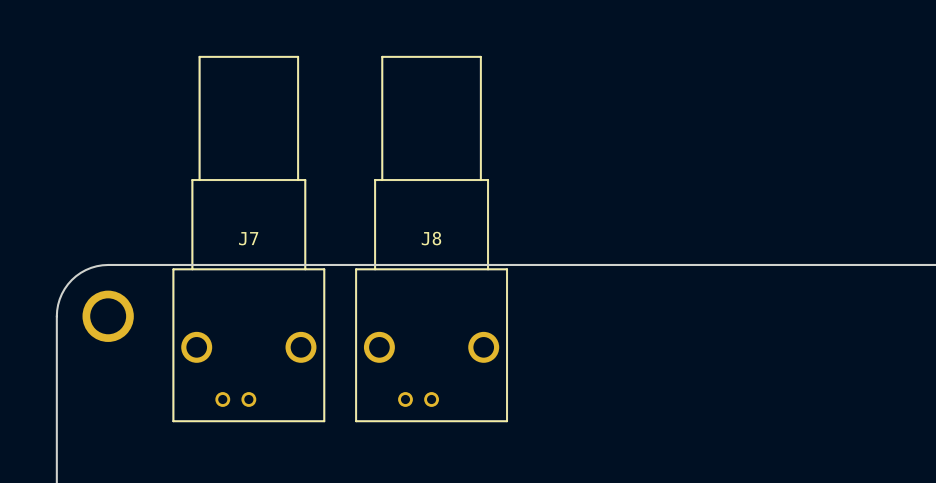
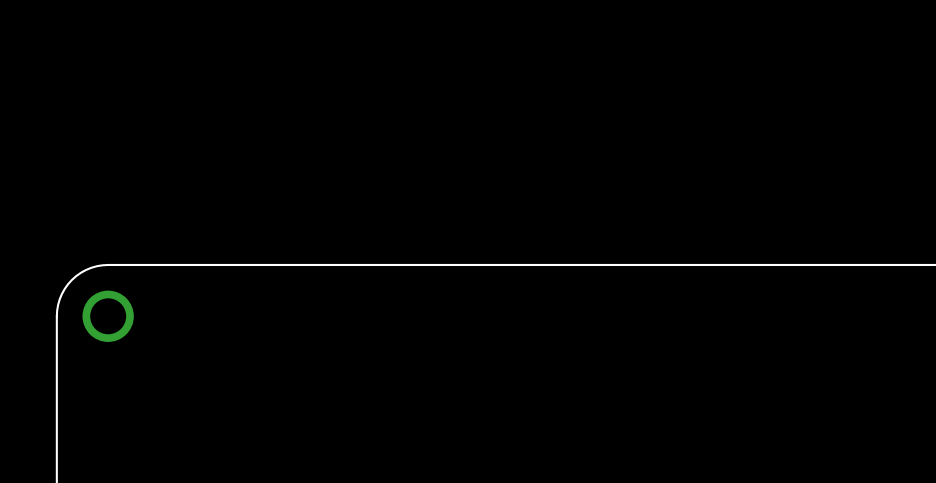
J7: (248, 239) -> none
J8: (431, 239) -> none

